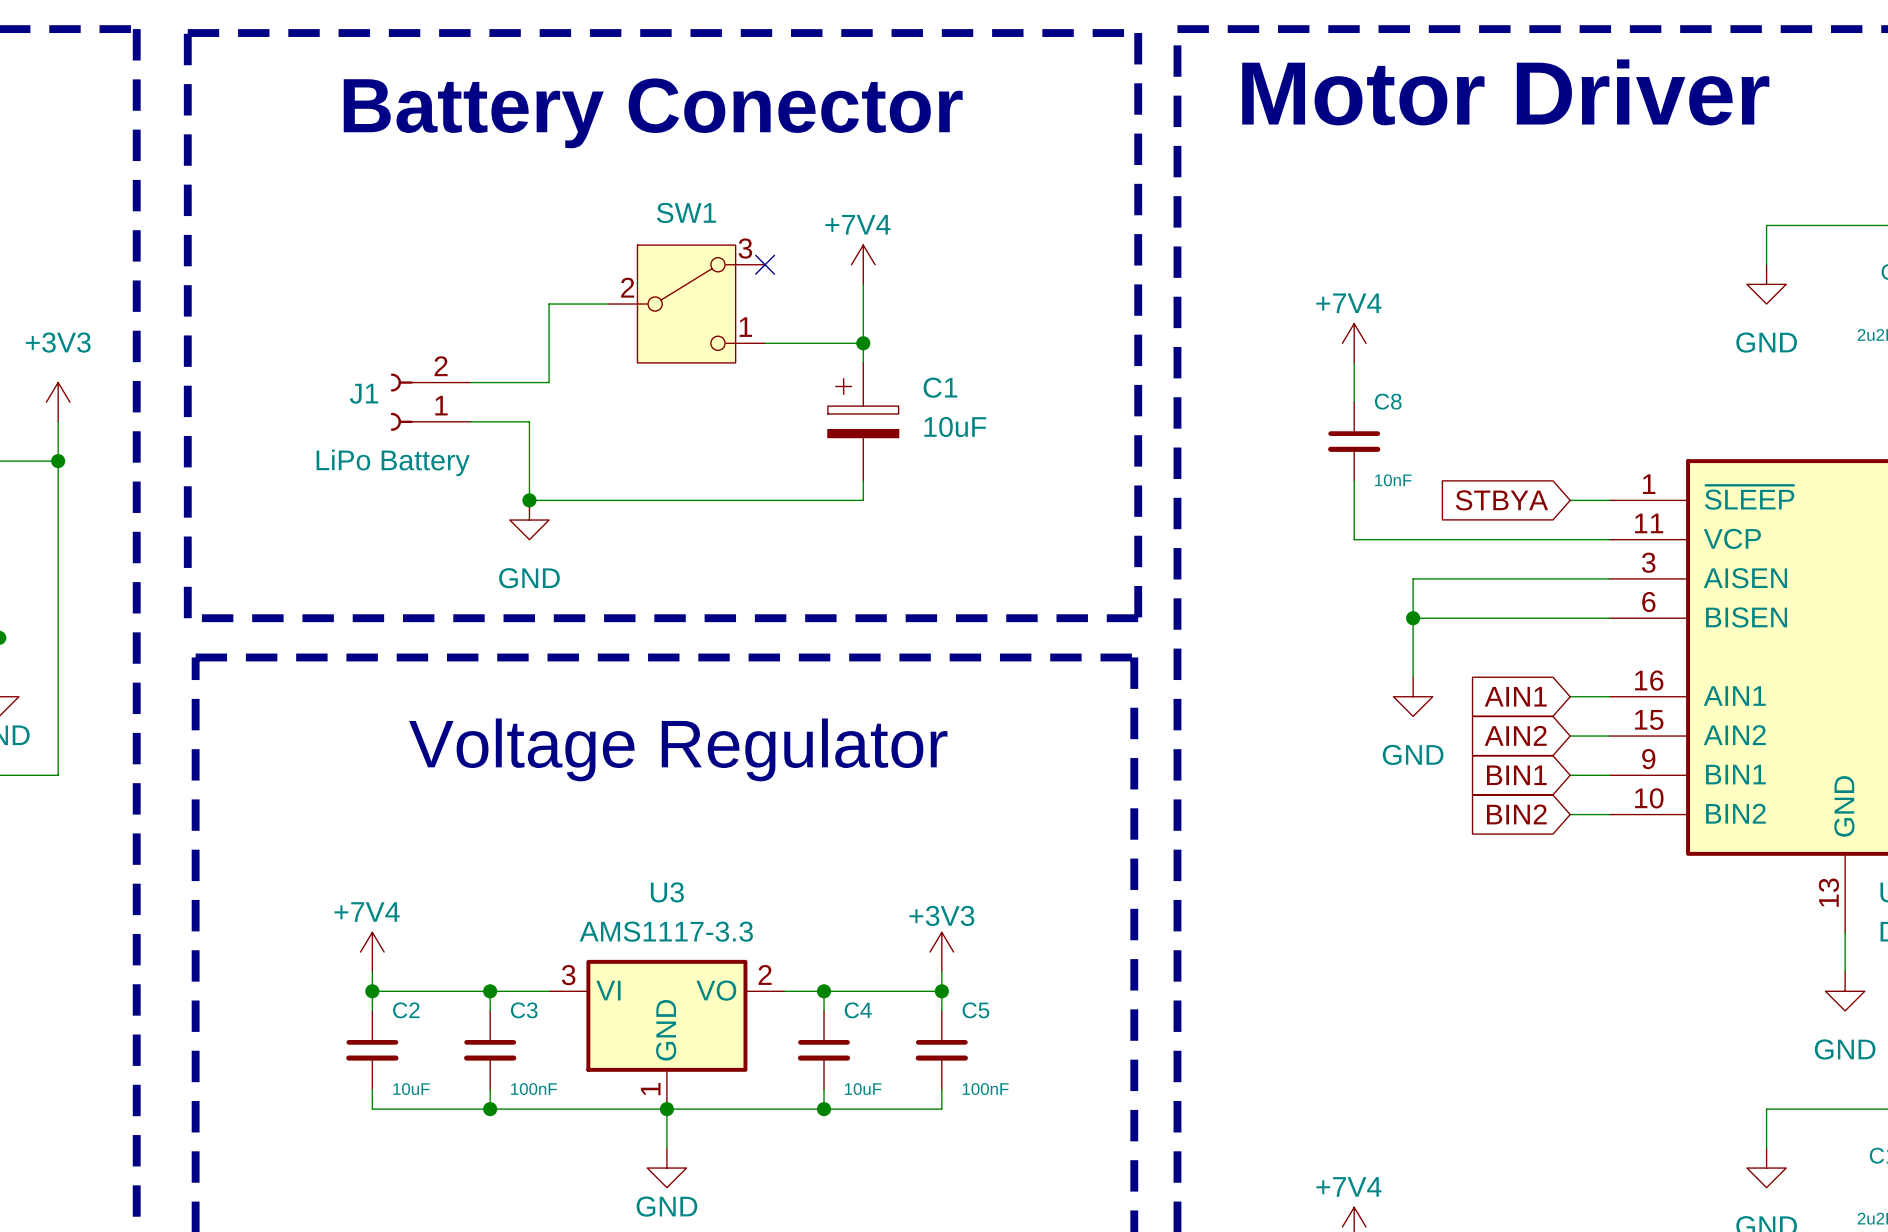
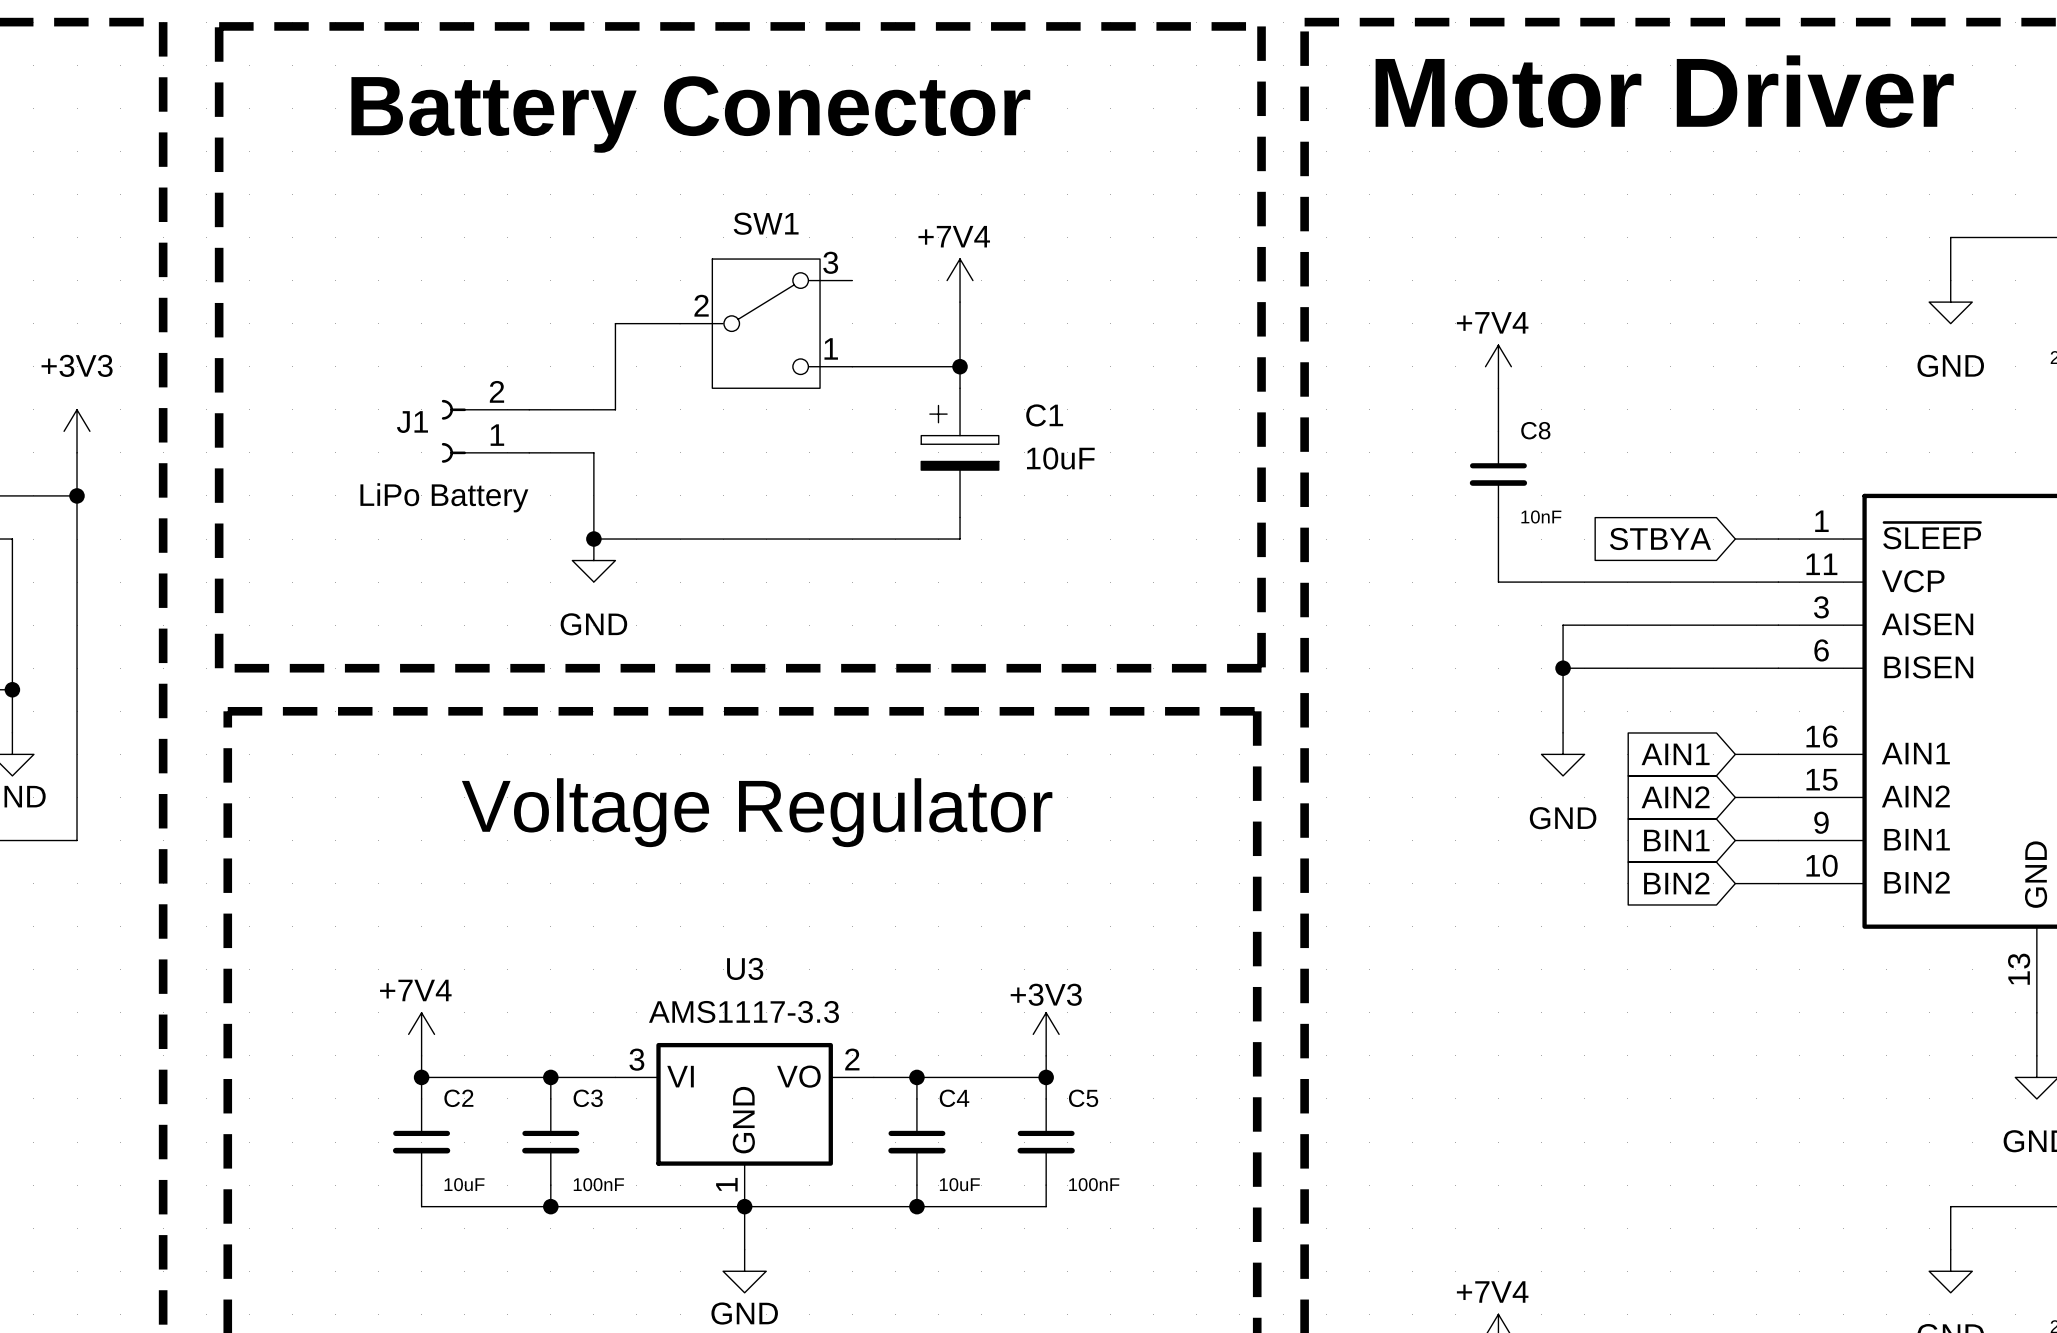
text position: Battery Conector (653, 113) -> Battery Conector (690, 114)
no-connect mark: (765, 264) -> none

